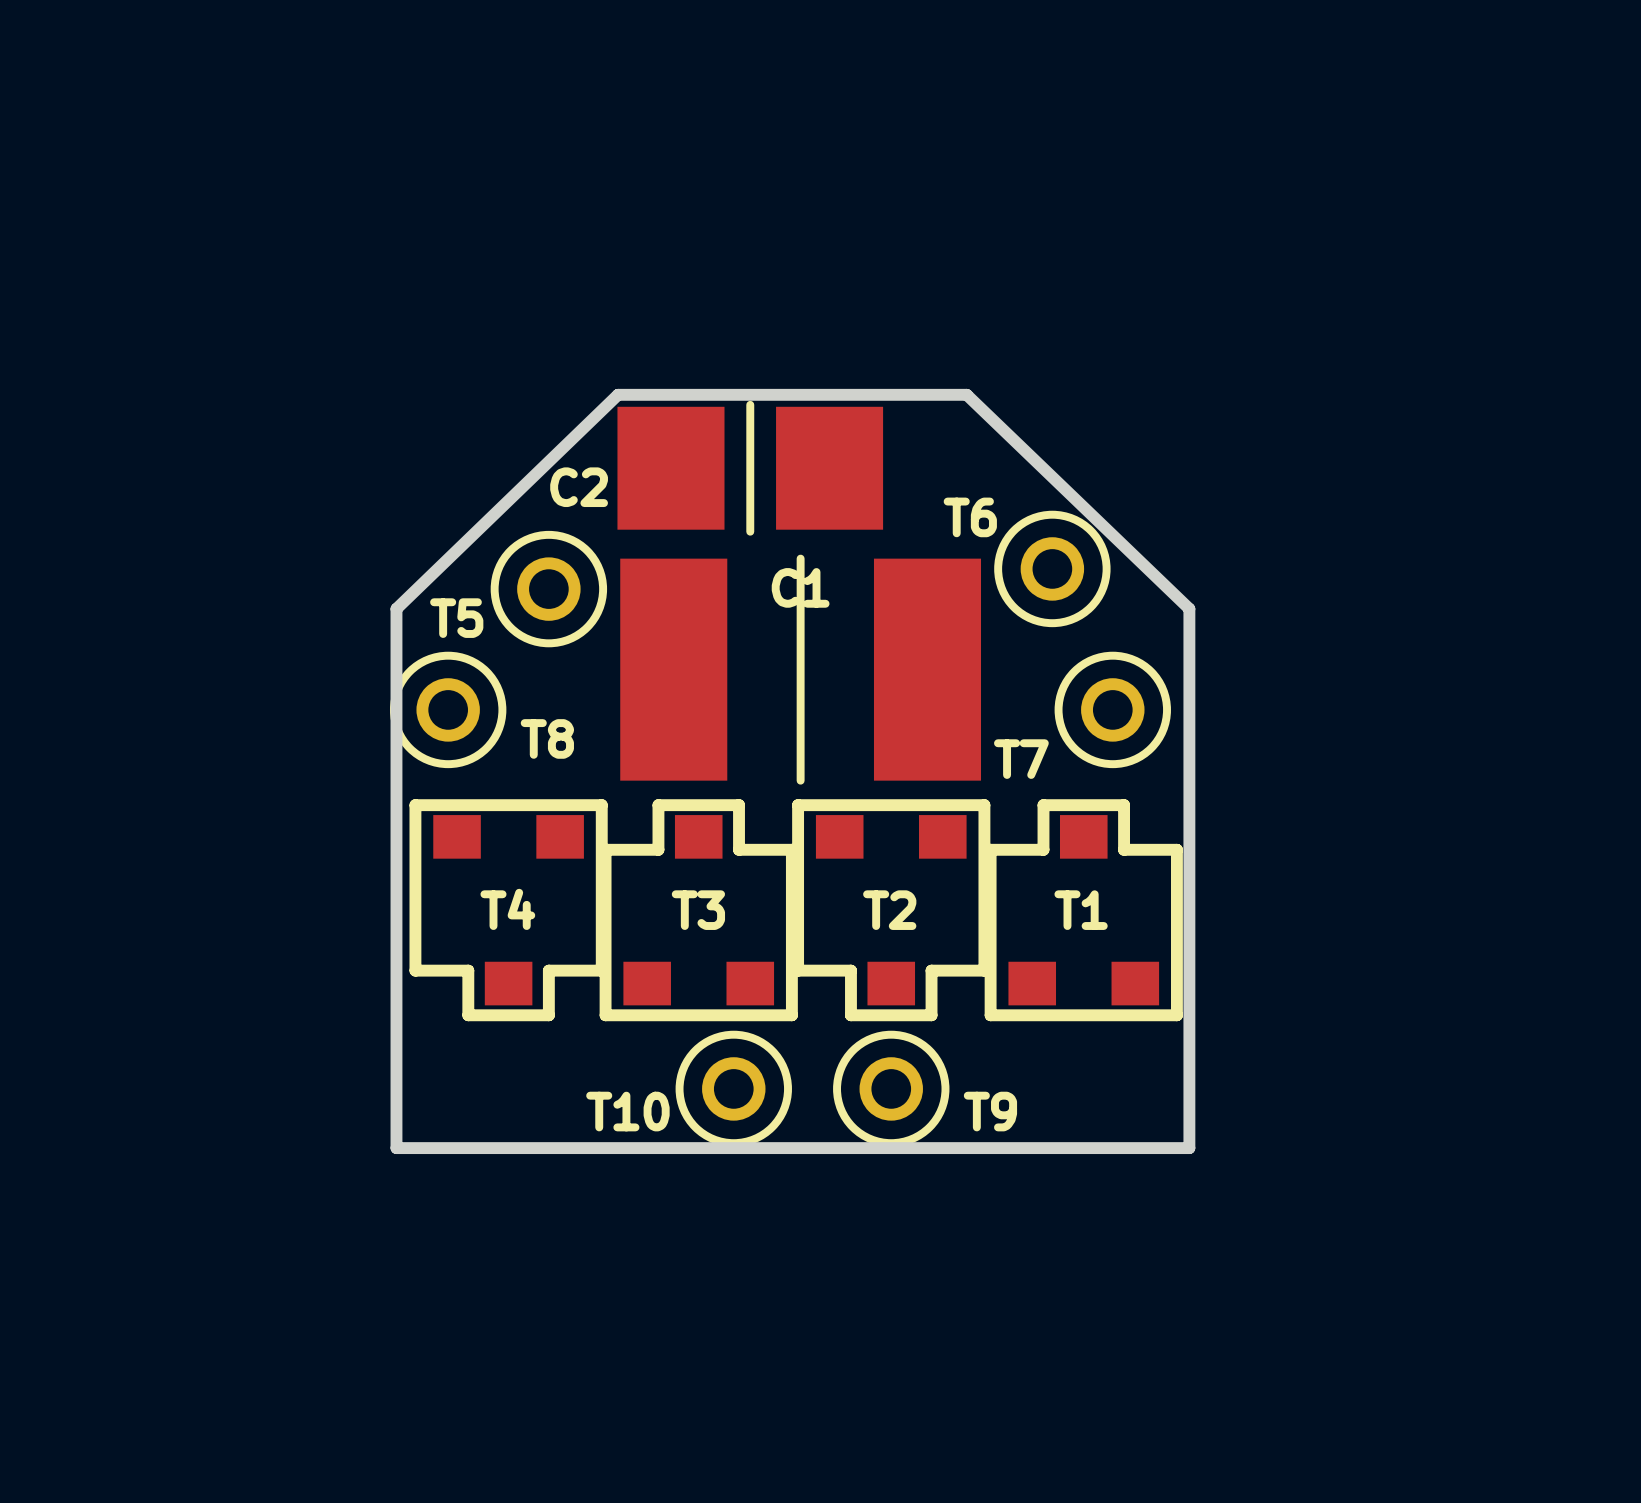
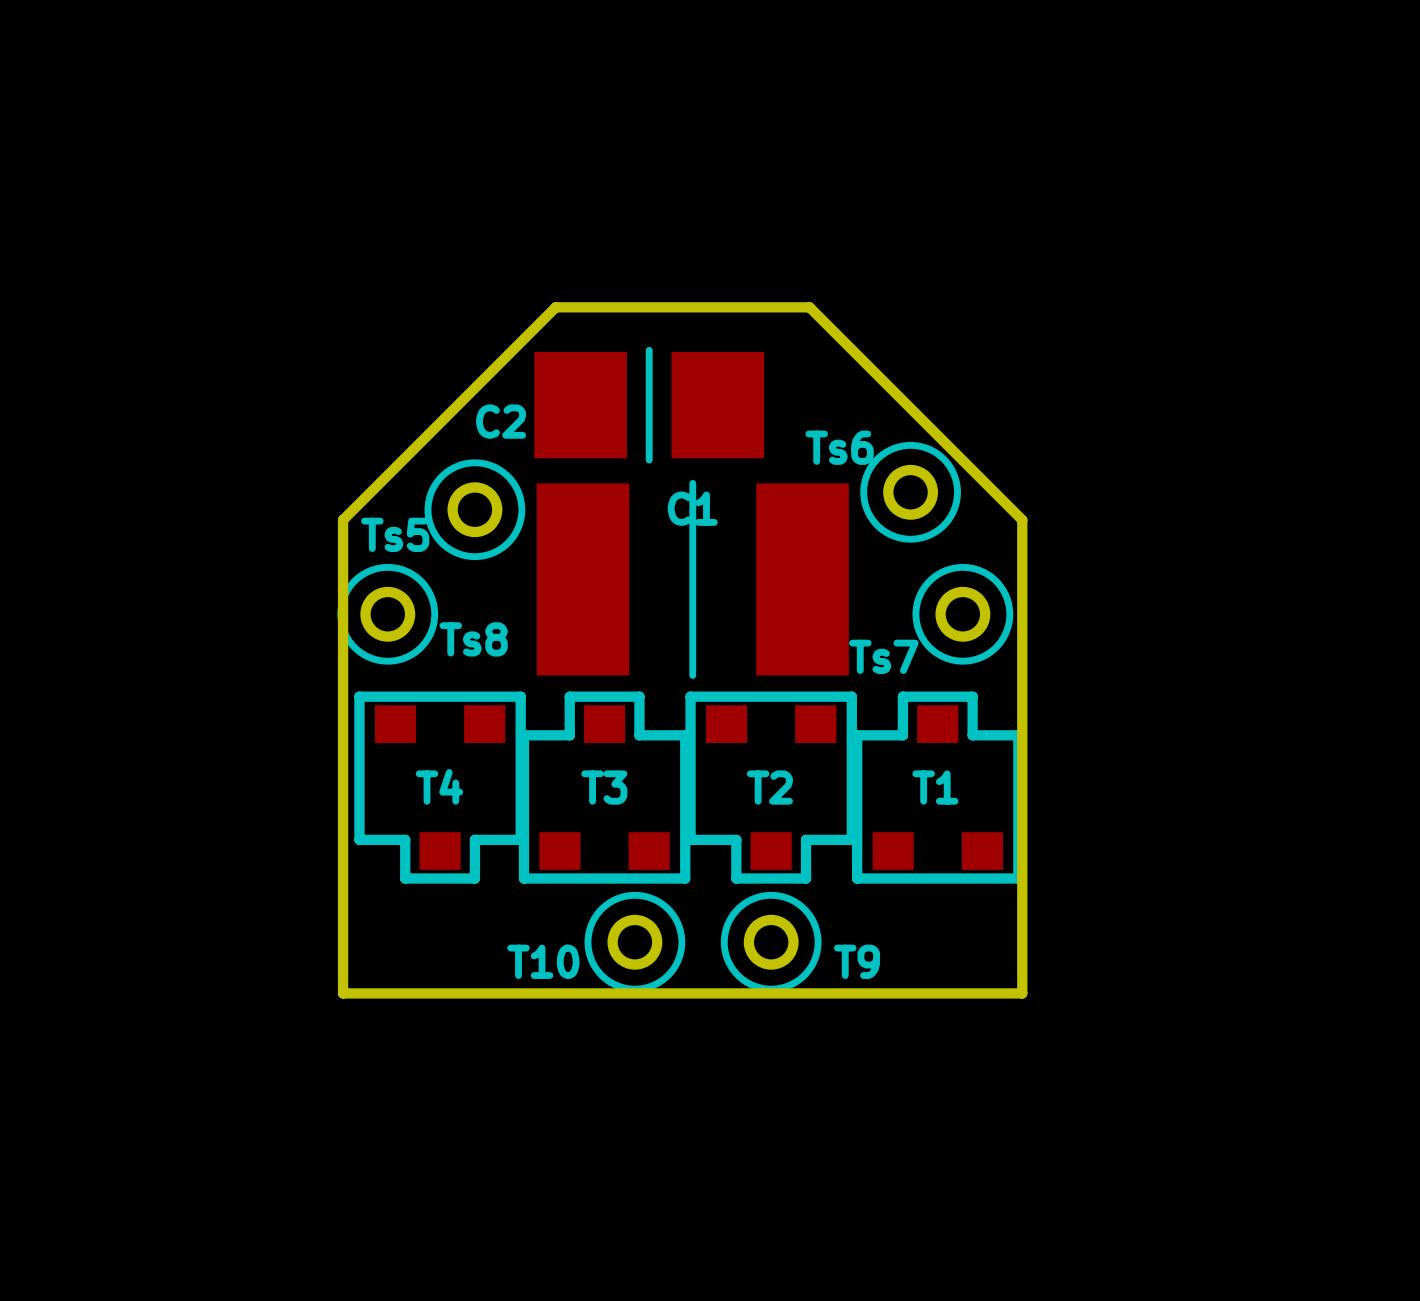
T6 name: T6 (970, 517) -> Ts6 (839, 447)
board edge: (396, 608) (618, 394) (966, 394) (1189, 608) (1189, 1148) (1181, 1148) -> (343, 526) (343, 520) (555, 307) (809, 307) (1022, 520) (1022, 993)
T5 name: T5 (456, 618) -> Ts5 (395, 534)
T8 name: T8 (547, 738) -> Ts8 (473, 639)
T7 name: T7 (1021, 759) -> Ts7 (883, 656)

